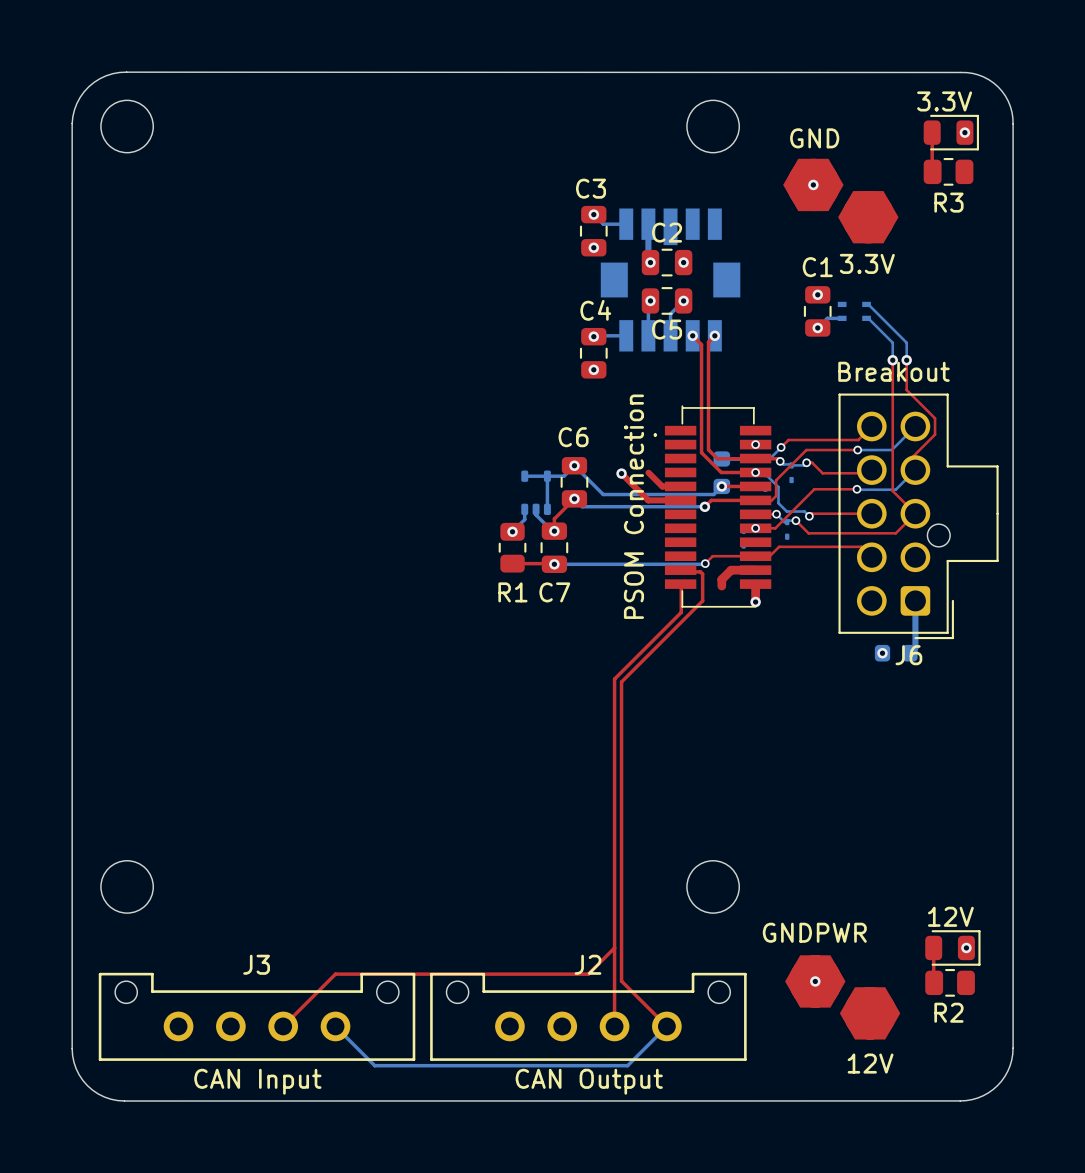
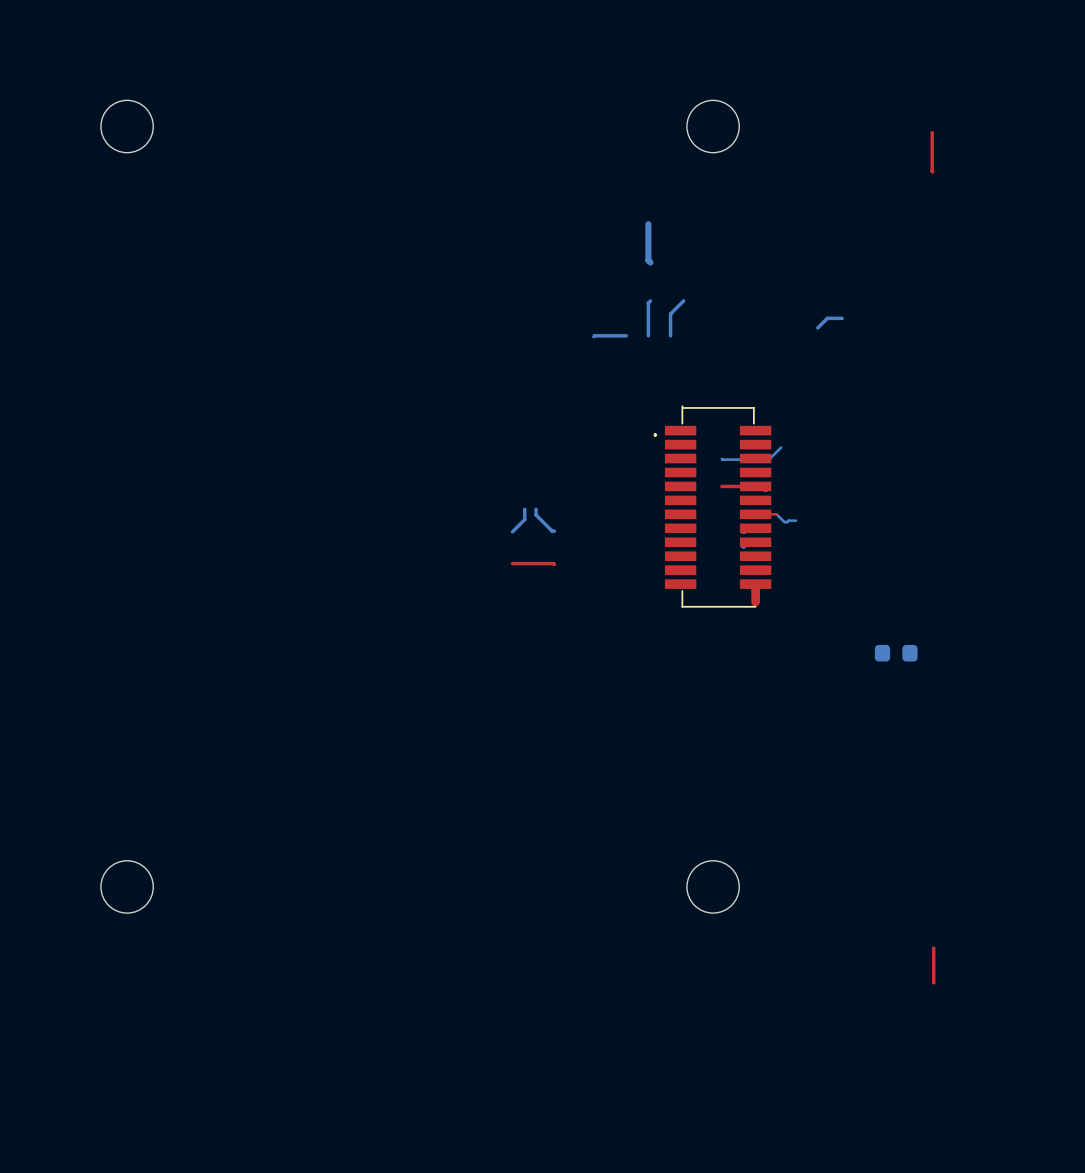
board edge: (126, 72) (966, 72) (983, 76) (1002, 91) (1010, 106) (1013, 123) (1013, 1048) (1007, 1071) (993, 1089) (977, 1097) (960, 1100) (124, 1101) (104, 1097) (92, 1090) (82, 1080) (73, 1062) (72, 1048) (72, 123) (76, 103) (88, 86) (106, 75) (126, 72) -> none
part: 3.3V (951, 132) -> none
via: (964, 132) -> none
text: GND (814, 138) -> none
R3: (948, 171) -> none
part: (813, 184) -> none
via: (813, 184) -> none
bottom track: (593, 214) (603, 224) (626, 224) -> none
via: (593, 214) -> none
part: (868, 217) -> none
C3: (593, 231) -> none
via: (593, 247) -> none
via: (650, 262) -> none
C2: (667, 262) -> none
via: (683, 262) -> none
text: 3.3V (867, 263) -> none
part: (670, 280) -> none
via: (817, 294) -> none
via: (650, 300) -> none
C5: (667, 300) -> none
via: (683, 300) -> none
bottom track: (866, 304) (906, 342) (906, 360) -> none
C1: (817, 311) -> none
part: (854, 311) -> none
bottom track: (866, 318) (892, 342) (892, 360) -> none
via: (817, 327) -> none
top track: (692, 335) (701, 344) (701, 452) (721, 472) (755, 472) -> none
via: (692, 335) -> none
top track: (714, 335) (708, 342) (708, 449) (717, 458) (777, 458) (780, 461) -> none
via: (714, 335) -> none
via: (593, 336) -> none
C4: (593, 353) -> none
top track: (892, 360) (892, 491) (915, 513) (895, 533) (808, 533) (795, 520) -> none
via: (892, 360) -> none
top track: (906, 360) (906, 390) (935, 418) (935, 434) (906, 461) (915, 470) -> none
via: (906, 360) -> none
via: (593, 369) -> none
text: Breakout (893, 371) -> none
top track: (871, 426) (858, 440) (788, 440) (781, 447) -> none
bottom track: (915, 426) (891, 450) (857, 450) -> none
via: (755, 444) -> none
via: (781, 447) -> none
top track: (857, 450) (806, 450) (776, 480) (776, 496) (771, 500) (711, 500) (704, 506) -> none
via: (857, 450) -> none
bottom track: (780, 461) (783, 464) (791, 465) (804, 465) (806, 462) -> none
via: (780, 461) -> none
top track: (806, 462) (812, 462) (822, 473) (868, 473) (871, 470) -> none
via: (806, 462) -> none
via: (574, 465) -> none
bottom track: (915, 470) (895, 489) (856, 489) -> none
top track: (648, 472) (662, 486) (680, 486) -> none
part: (721, 472) -> none
bottom track: (755, 472) (763, 472) (778, 487) (778, 503) (786, 511) (804, 511) (809, 516) -> none
via: (755, 472) -> none
part: (791, 472) -> none
top track: (621, 473) (648, 500) (680, 500) -> none
via: (621, 473) -> none
bottom track: (524, 476) (563, 476) (574, 465) (603, 494) (713, 494) (721, 486) -> none
bottom track: (547, 476) (547, 509) -> none
C6: (574, 482) -> none
via: (721, 486) -> none
top track: (856, 489) (814, 489) (775, 528) (755, 528) -> none
via: (856, 489) -> none
part: (536, 492) -> none
top track: (574, 498) (554, 518) (554, 531) -> none
bottom track: (574, 498) (582, 506) (704, 506) -> none
via: (574, 498) -> none
text: PSOM Connection (633, 506) -> none
via: (704, 506) -> none
top track: (871, 513) (812, 513) (809, 516) -> none
via: (776, 514) -> none
via: (809, 516) -> none
J6: (918, 516) -> none
via: (795, 520) -> none
via: (755, 528) -> none
part: (787, 529) -> none
via: (512, 531) -> none
via: (554, 531) -> none
R1: (512, 547) -> none
C7: (554, 547) -> none
top track: (871, 557) (861, 546) (779, 546) (769, 556) (712, 556) (705, 563) -> none
bottom track: (705, 563) (554, 564) -> none
via: (705, 563) -> none
via: (554, 564) -> none
top track: (681, 569) (683, 571) (700, 571) (702, 574) (702, 600) (621, 682) (621, 981) (666, 1026) -> none
top track: (755, 570) (731, 570) (721, 579) (721, 586) -> none
top track: (681, 583) (681, 612) (614, 679) (614, 1026) -> none
bottom track: (915, 600) (915, 647) (909, 653) -> none
via: (755, 602) -> none
via: (882, 653) -> none
text: GNDPWR (814, 932) -> none
top track: (614, 947) (588, 974) (335, 974) (283, 1026) -> none
part: 12V (952, 947) -> none
via: (966, 947) -> none
part: (815, 981) -> none
via: (815, 981) -> none
R2: (950, 982) -> none
part: (870, 1013) -> none
J3: CAN Input (257, 1016) -> none
J2: CAN Output (588, 1016) -> none
bottom track: (335, 1026) (374, 1065) (627, 1065) (666, 1026) -> none
text: 12V (870, 1063) -> none

